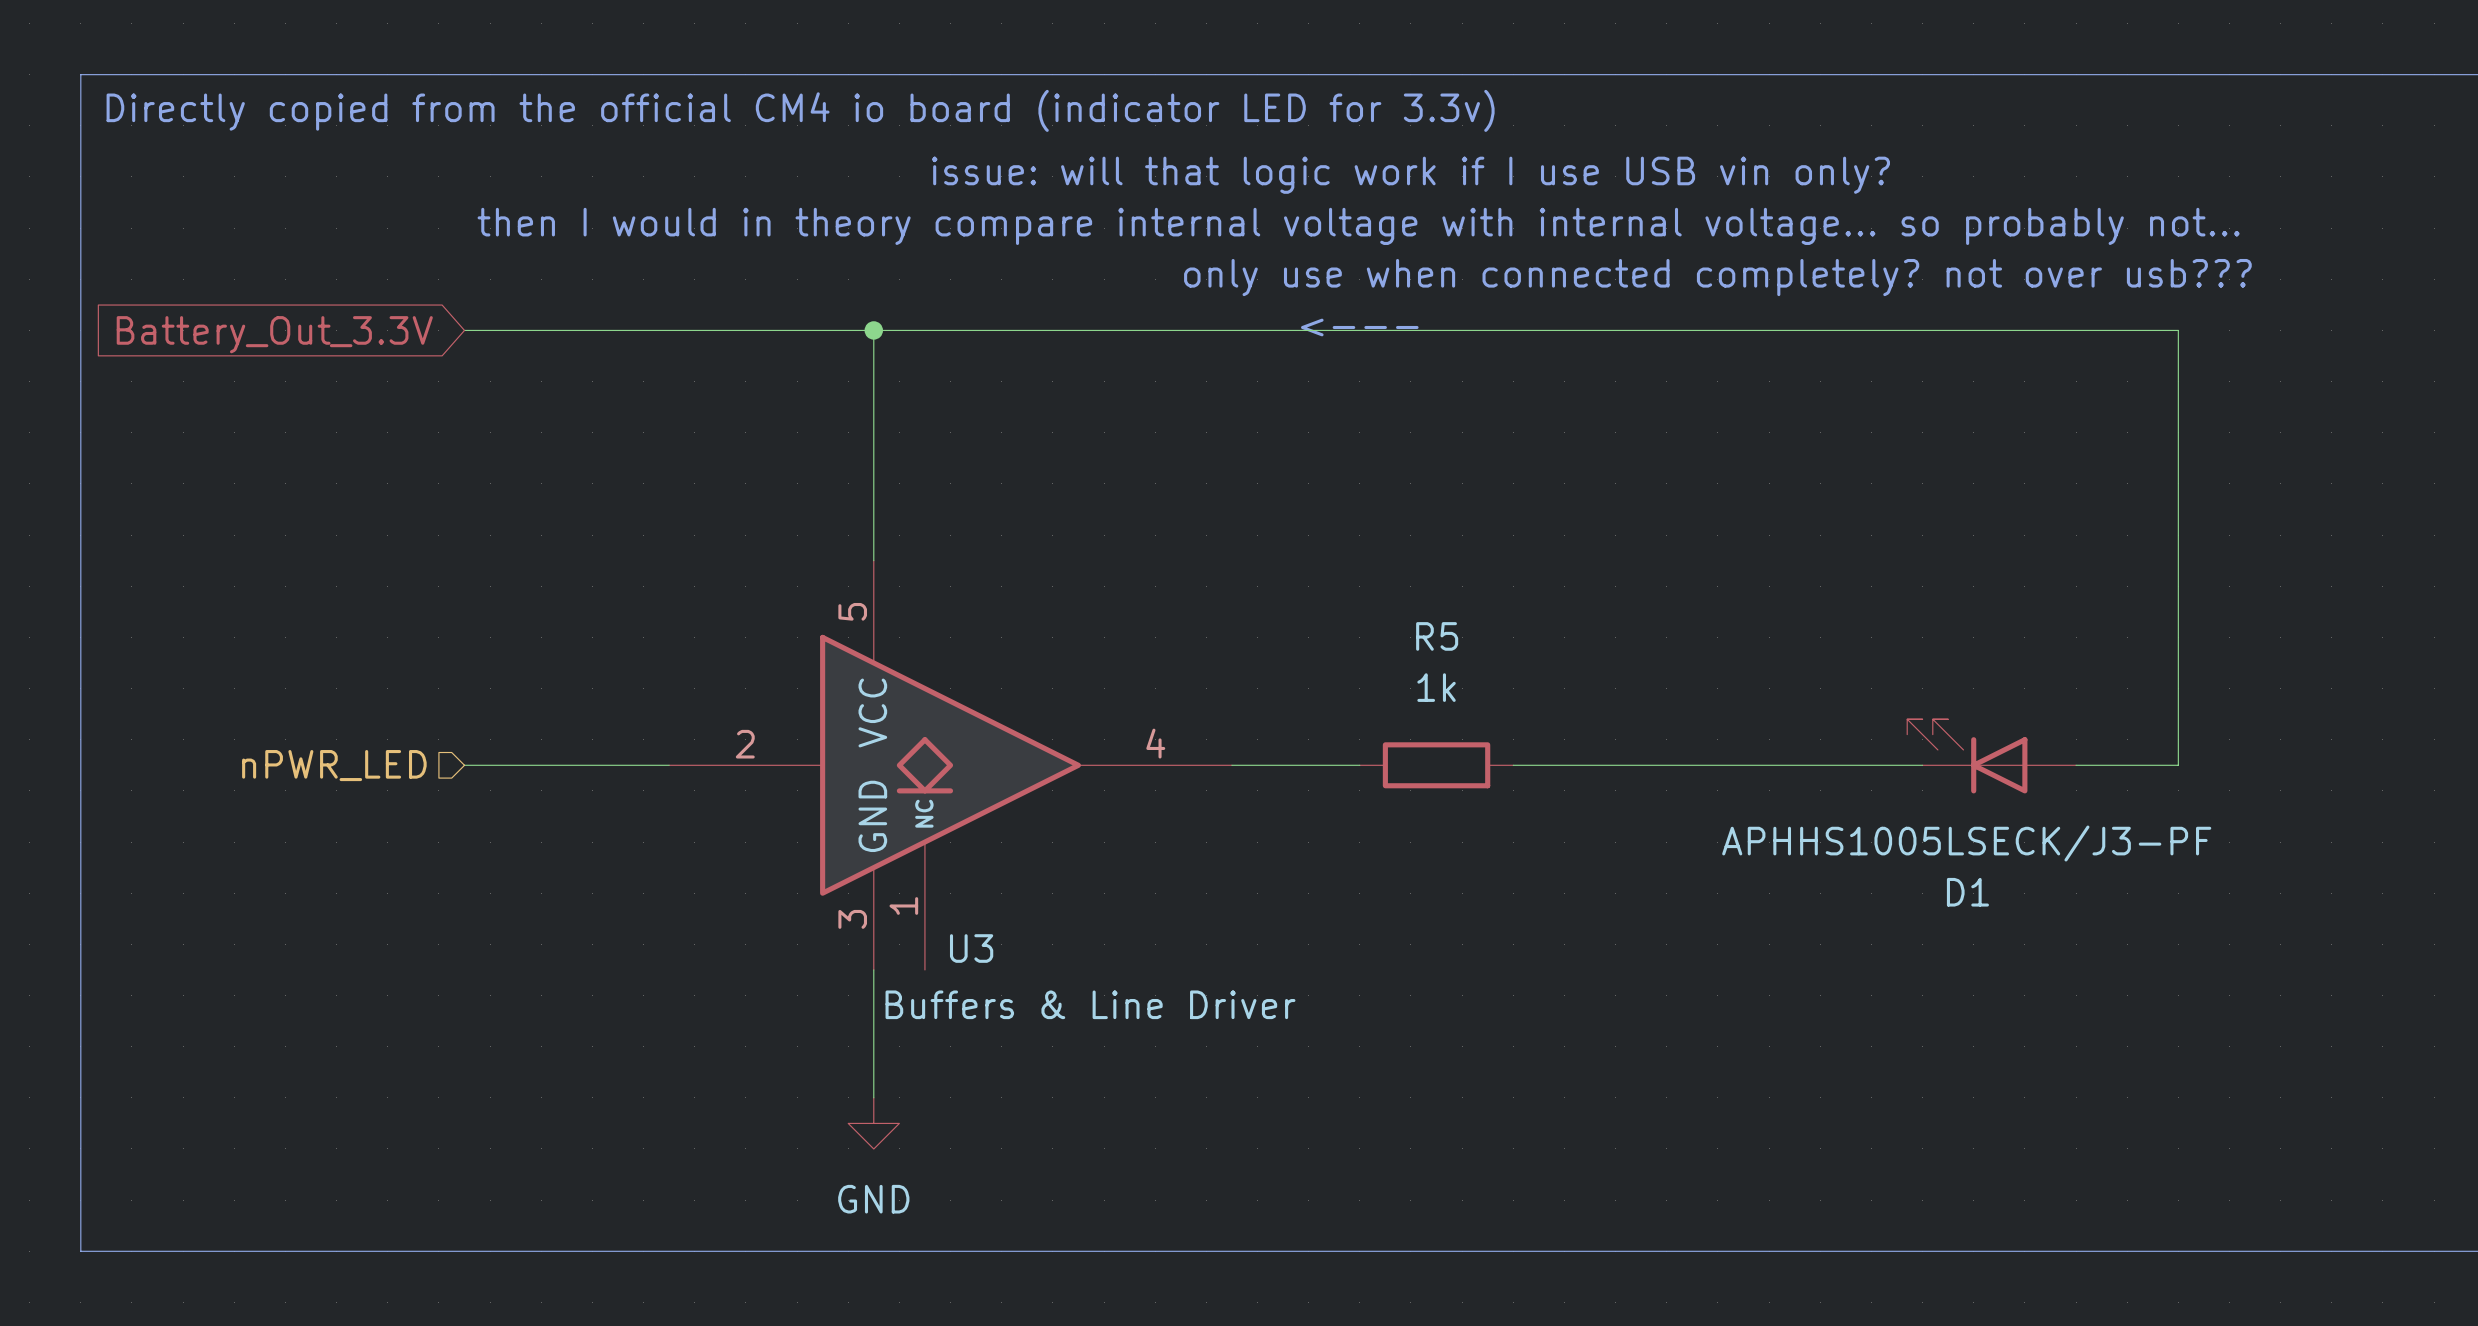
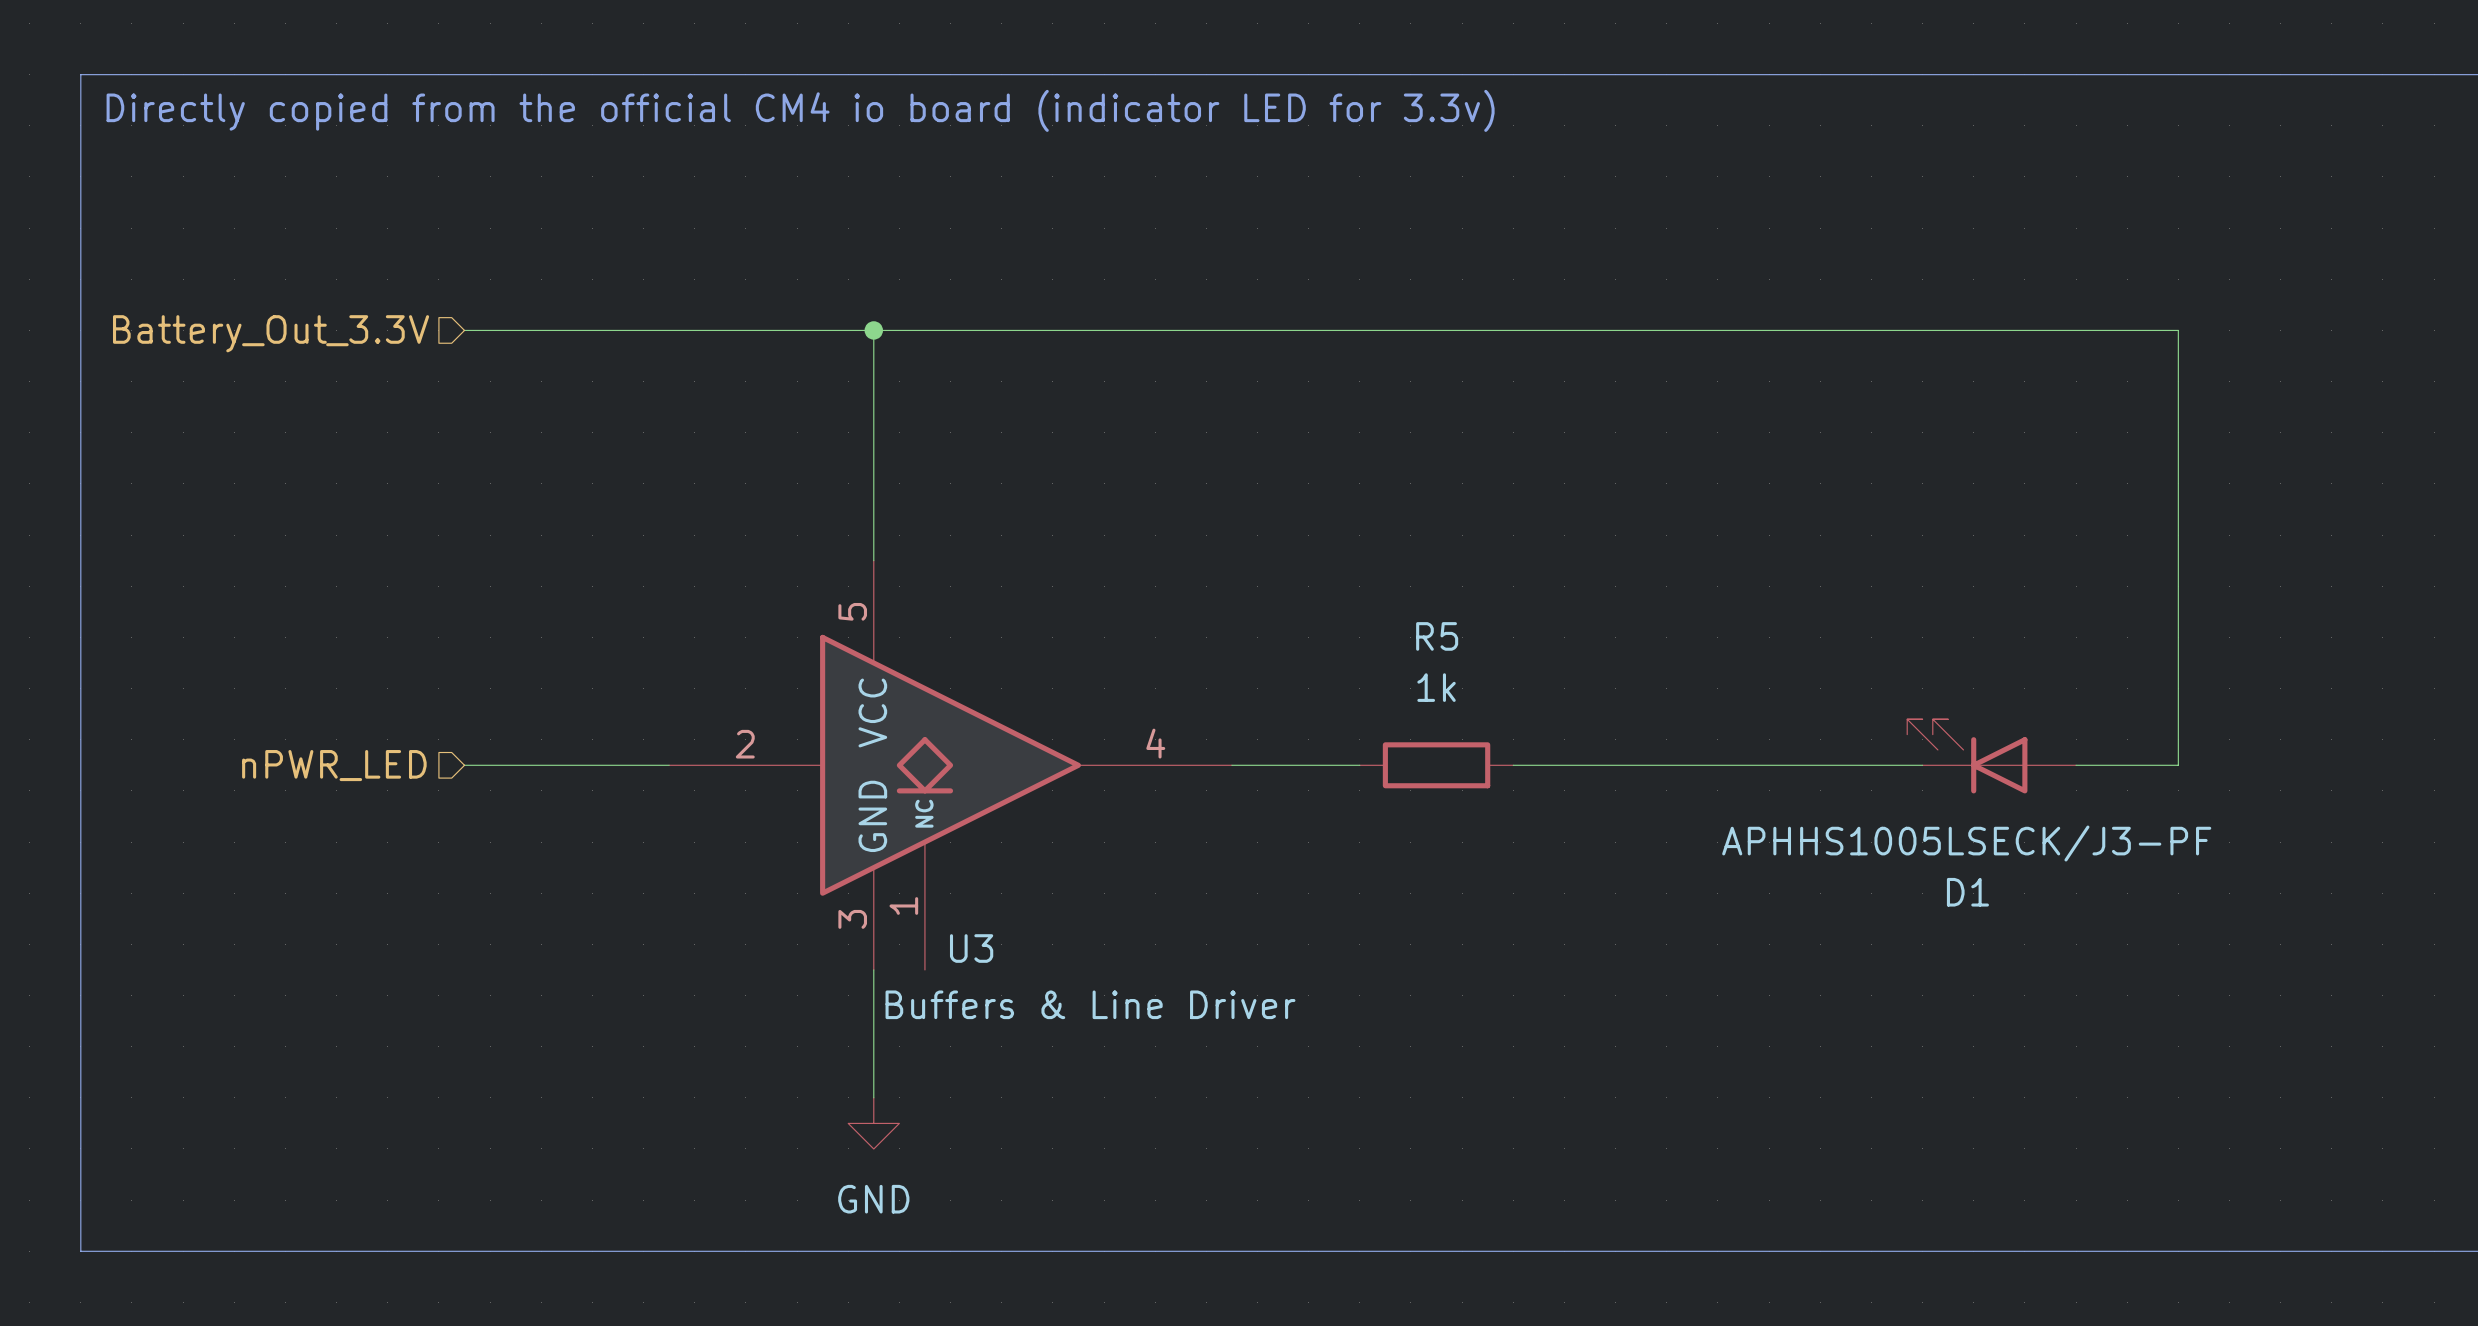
text: issue: will that logic work if I use USB vin only? (1410, 175) -> none
text: then I would in theory compare internal voltage with internal voltage... so probably not... (1358, 226) -> none
text: only use when connected completely? not over usb??? (1717, 277) -> none
text: <--- (1359, 327) -> none
hierarchical label: none -> Battery_Out_3.3V (271, 333)
global label: Battery_Out_3.3V (274, 334) -> none

